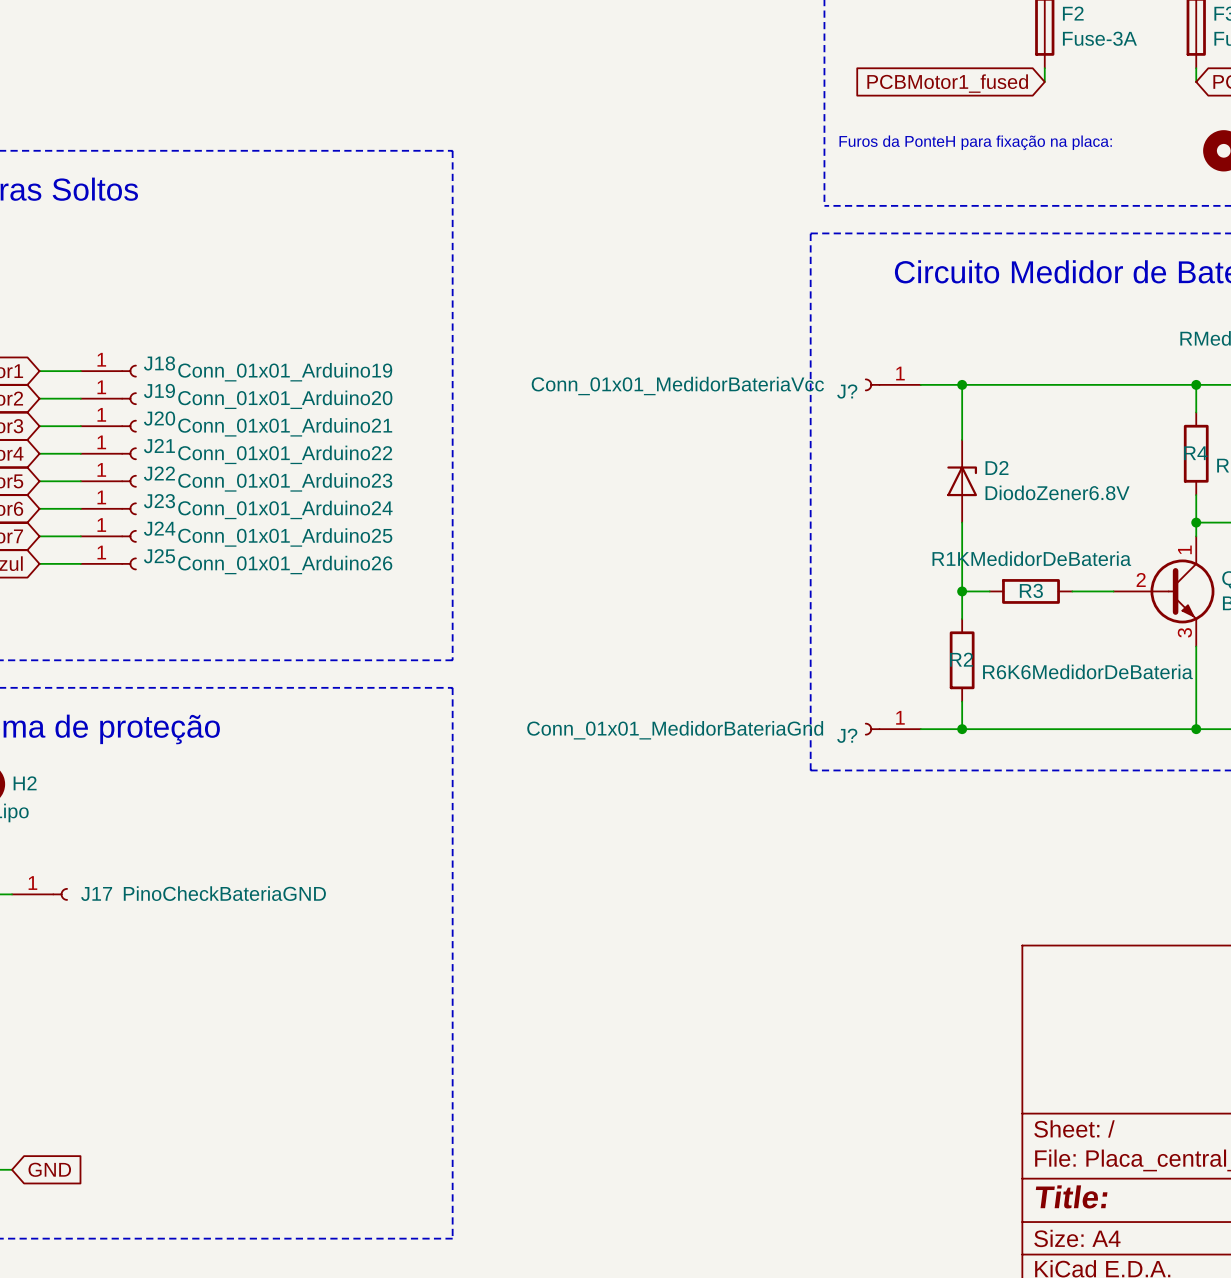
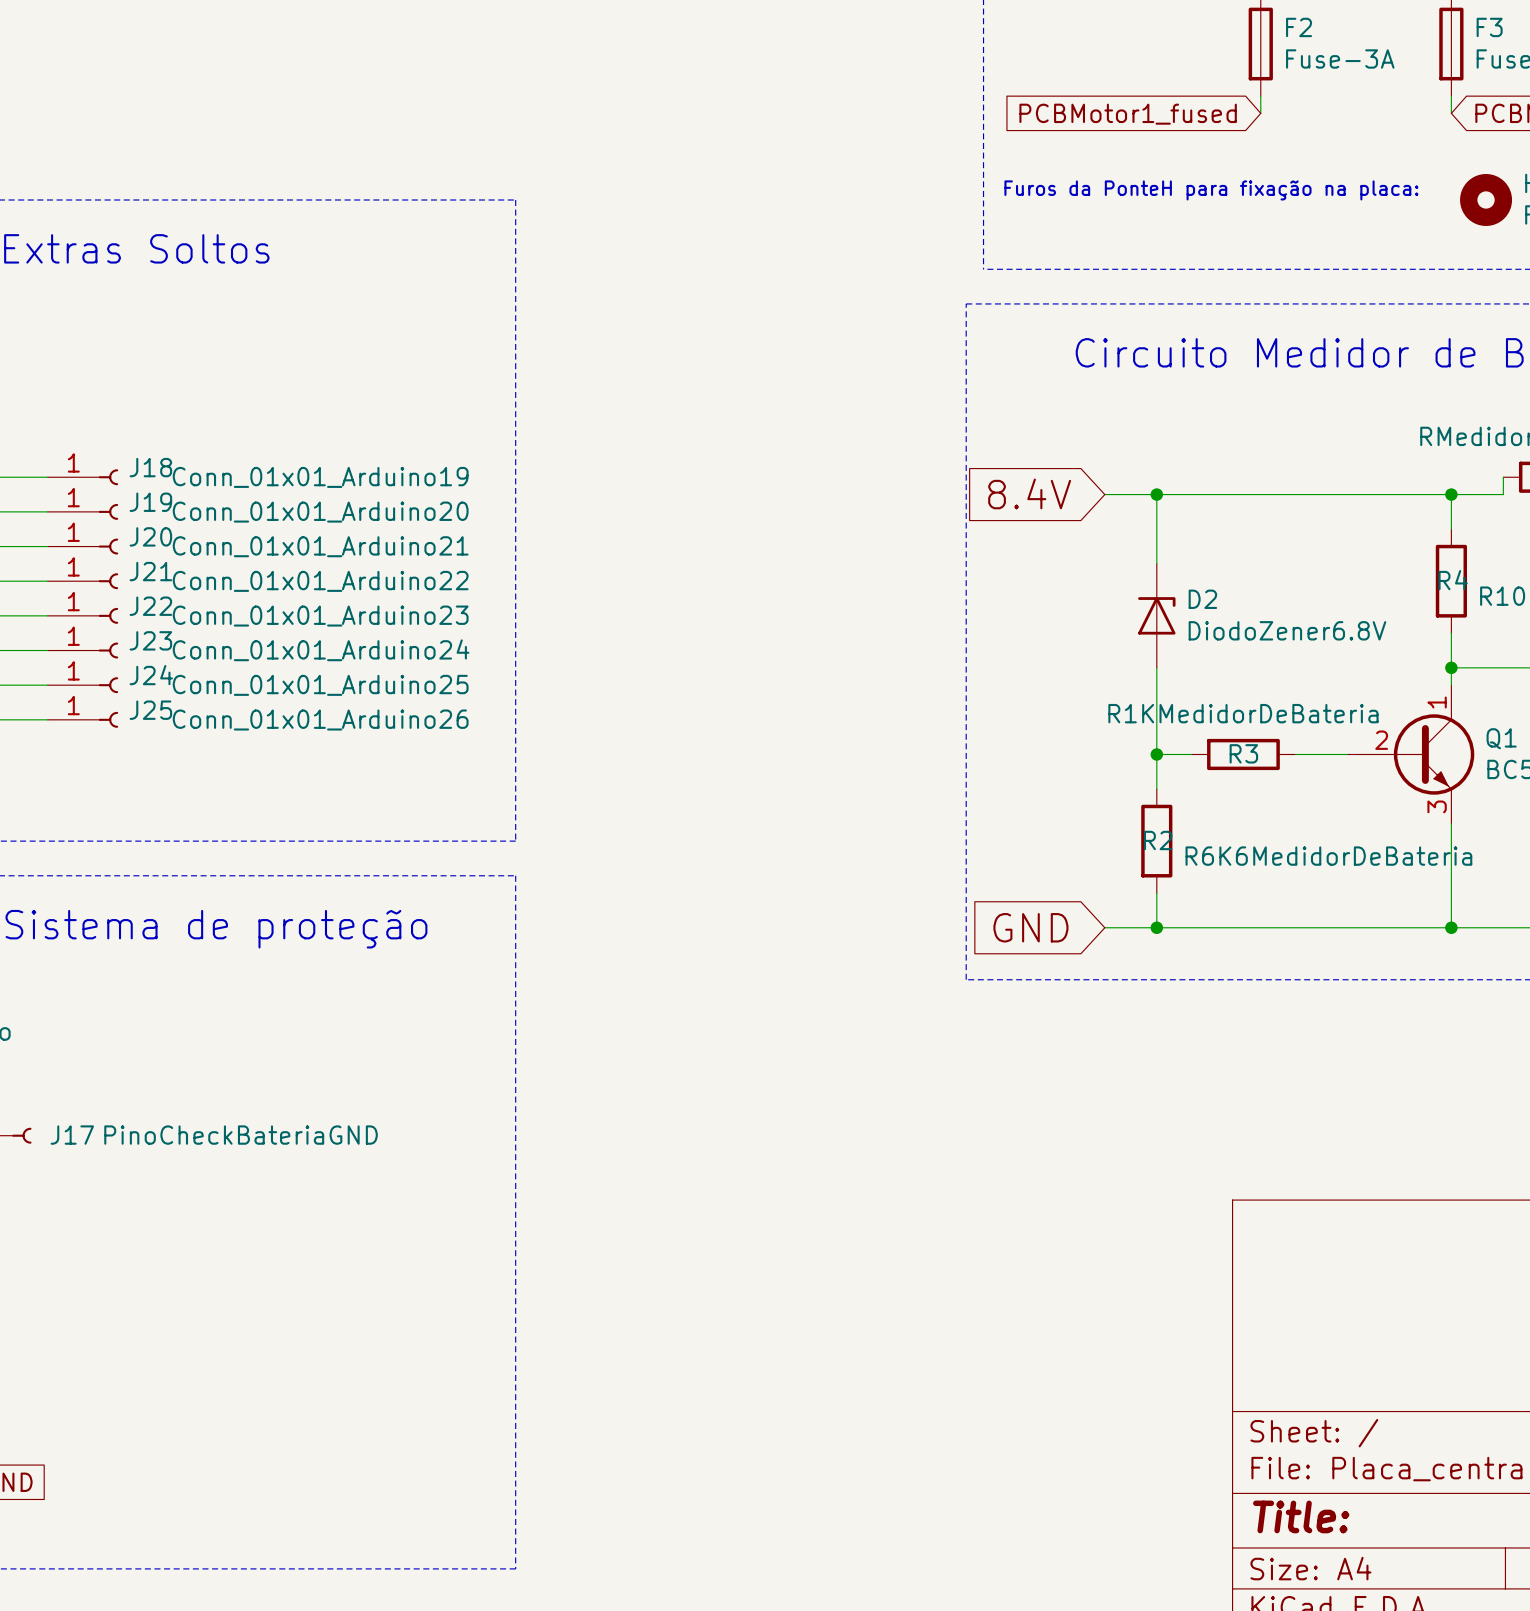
global label: none -> 8.4V (1029, 493)
J?: Conn_01x01_MedidorBateriaVcc (892, 384) -> none
global label: none -> GND (1030, 927)
J?: Conn_01x01_MedidorBateriaGnd (892, 729) -> none

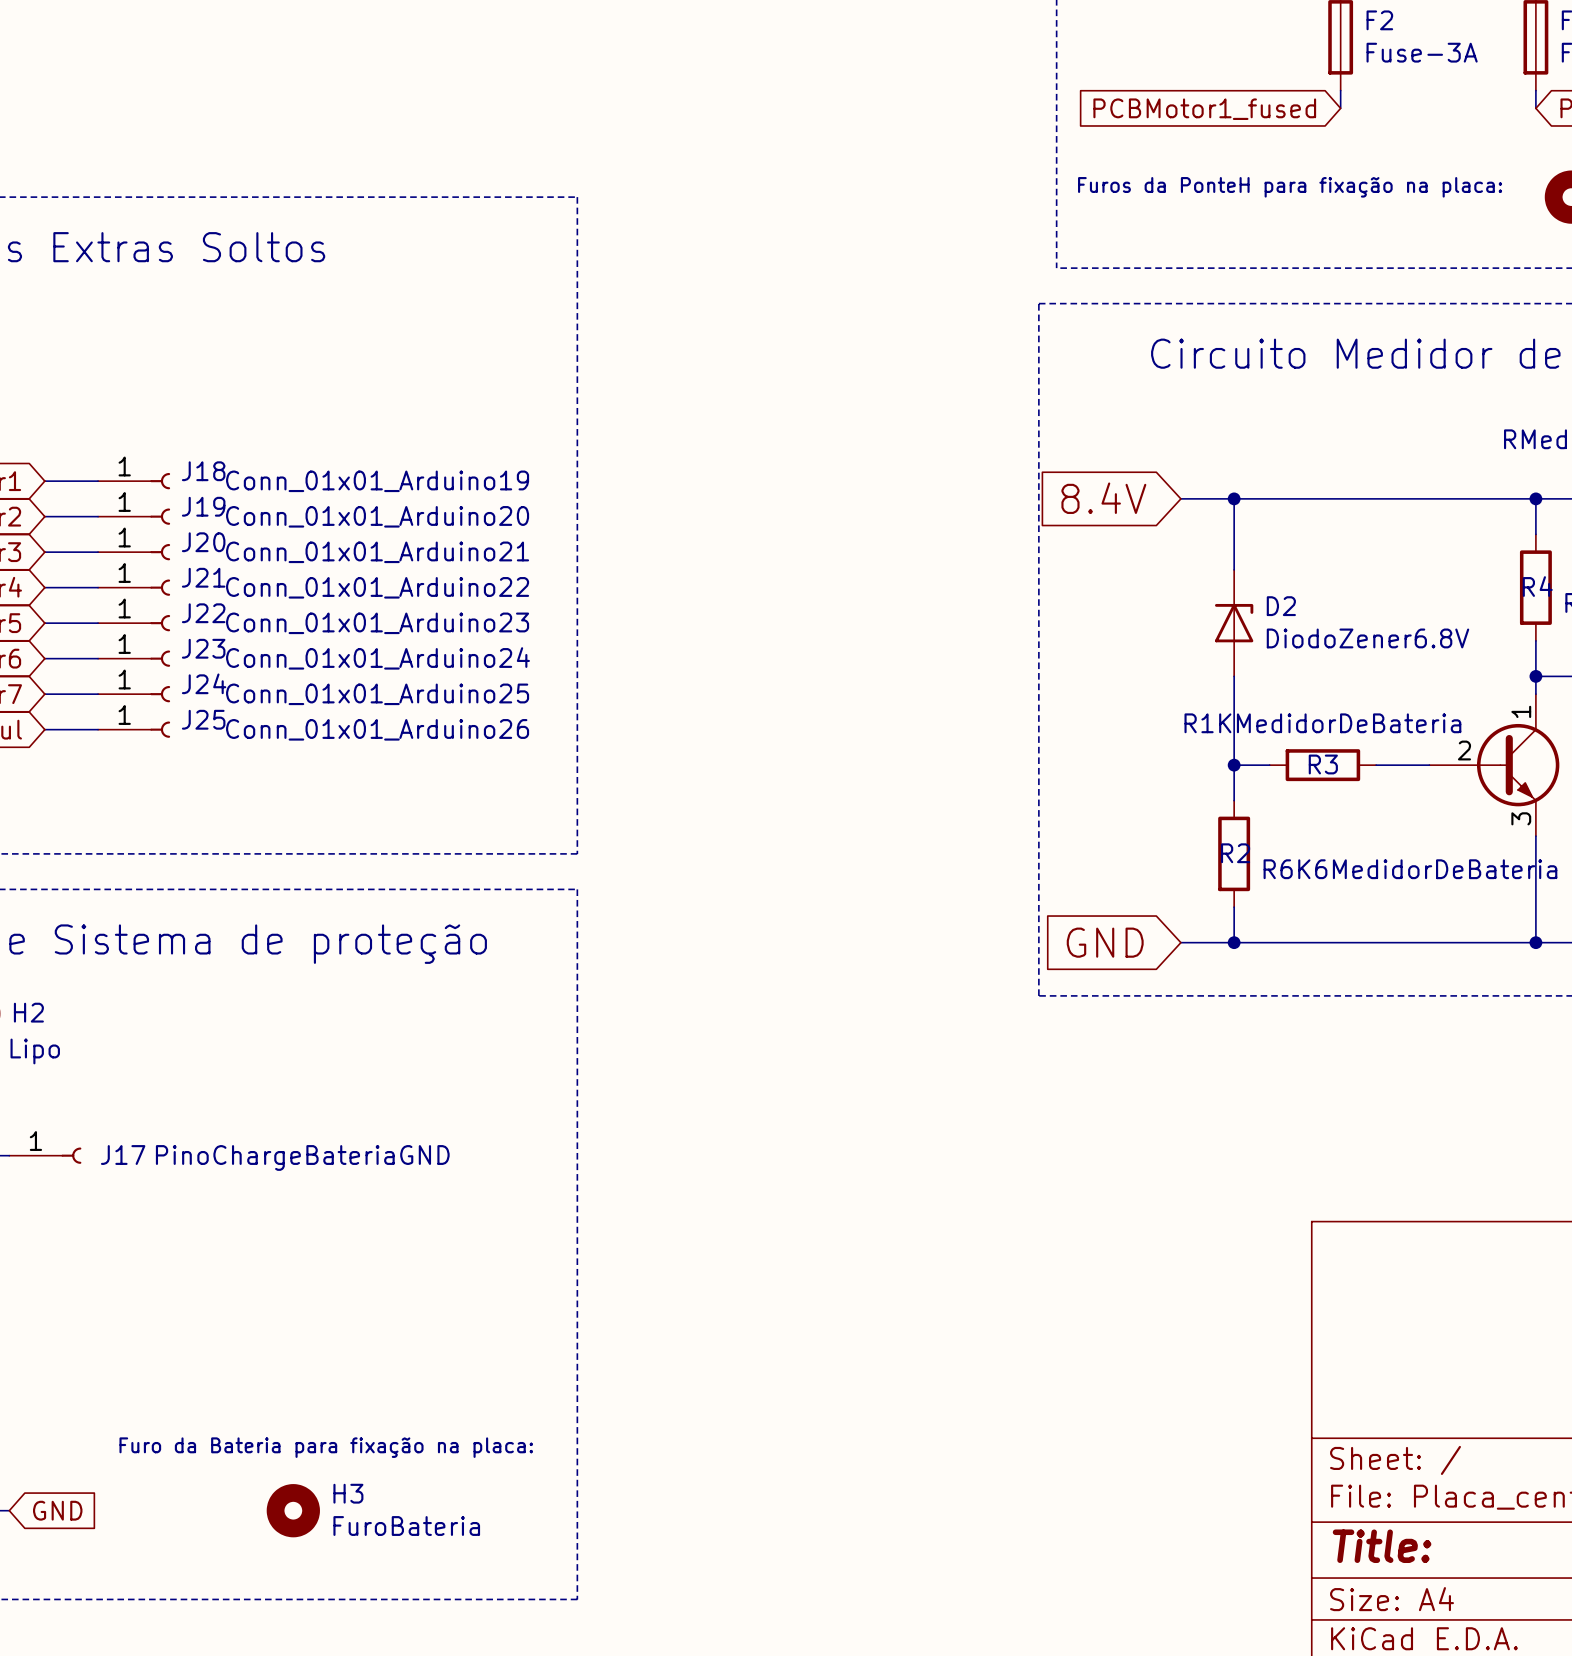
J17 value: PinoCheckBateriaGND (241, 1135) -> PinoChargeBateriaGND (302, 1157)
text: none -> Furo da Bateria para fixação na placa: (326, 1447)
H3: none -> FuroBateria (293, 1510)

